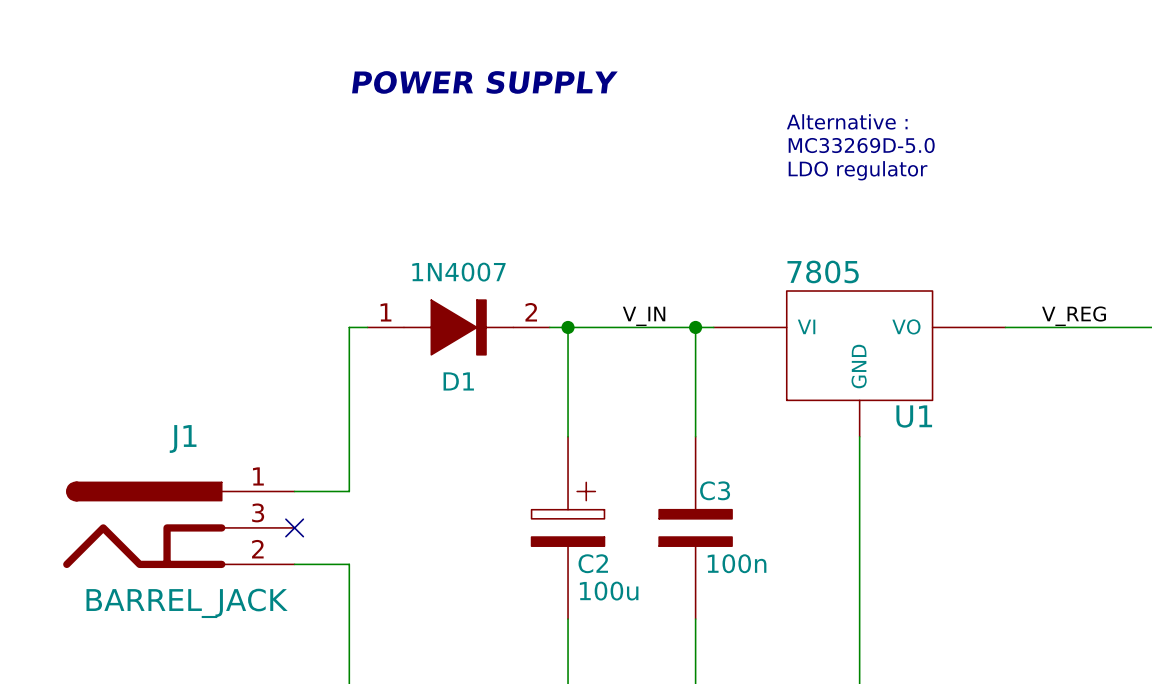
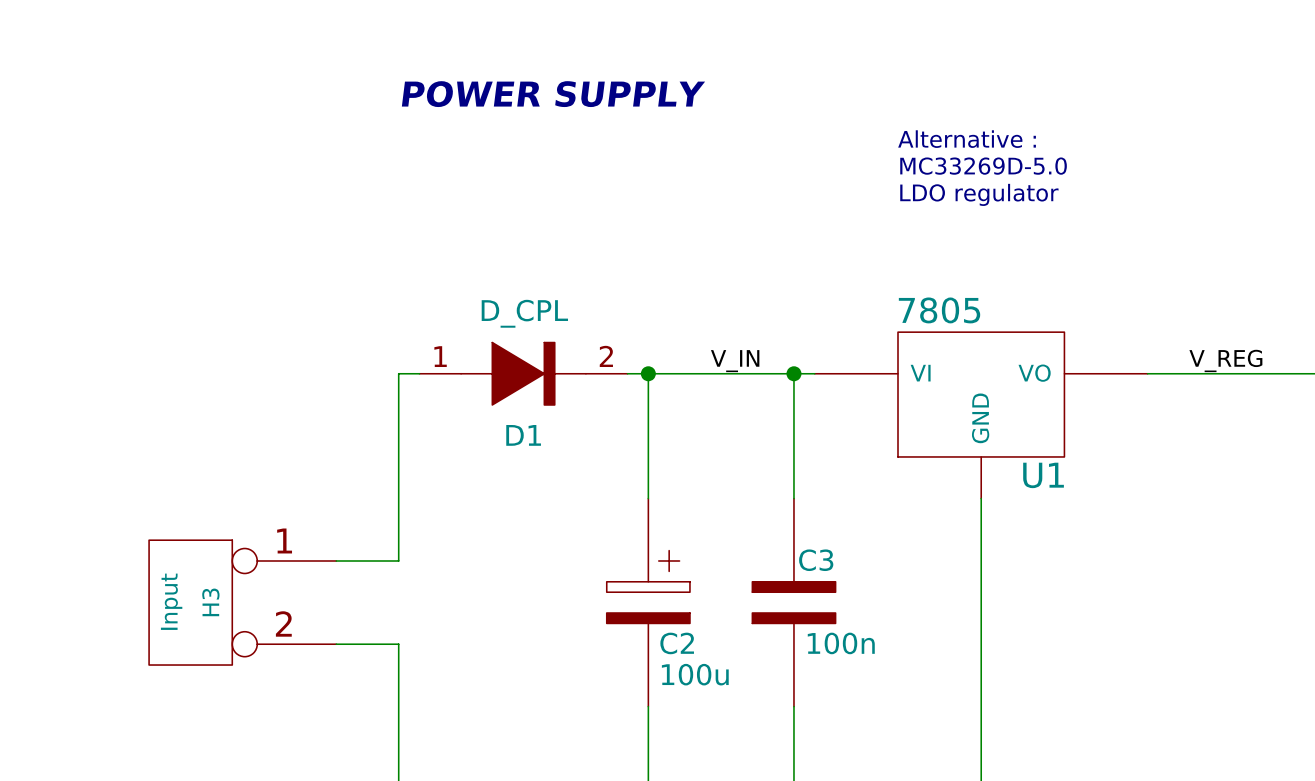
D1 value: 1N4007 (458, 272) -> D_CPL (524, 313)
J1: BARREL_JACK (178, 525) -> none
H3: none -> Input (242, 602)
no-connect mark: (294, 527) -> none

